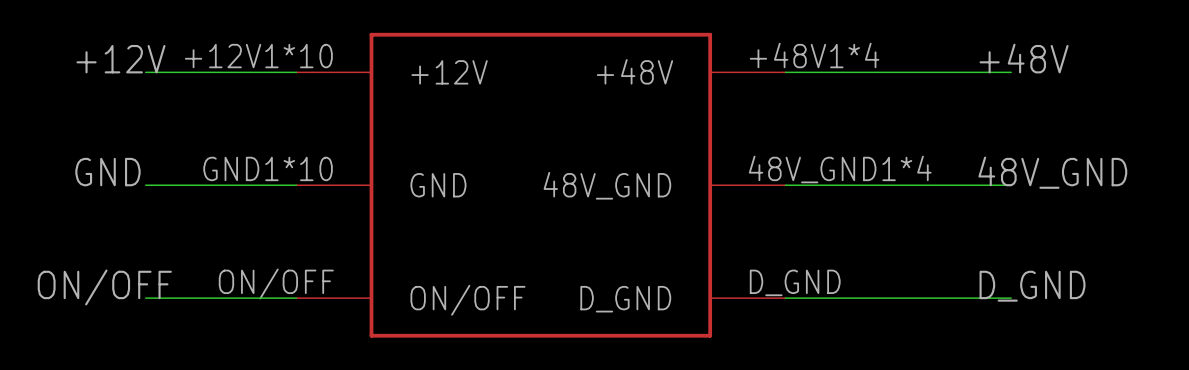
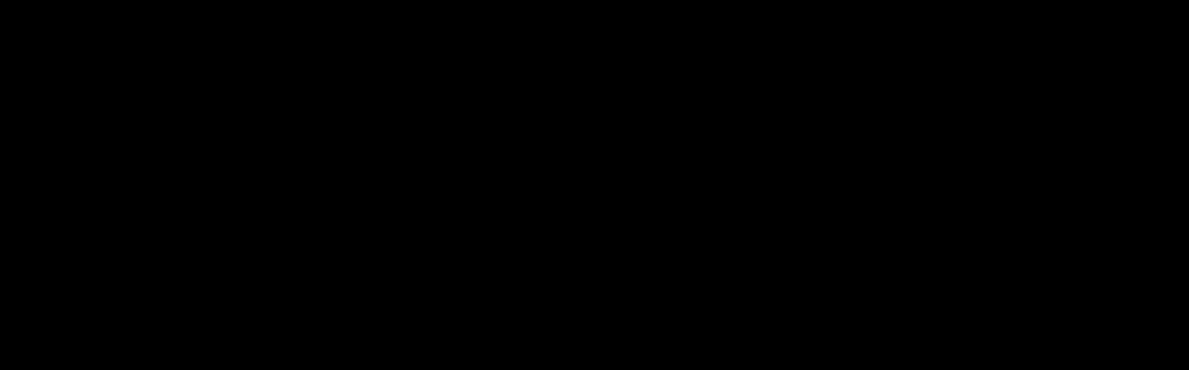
label: +48V (1024, 58) -> none
label: +12V (120, 59) -> none
wire: (145, 72) (296, 72) -> none
wire: (785, 72) (1011, 72) -> none
label: GND (107, 172) -> none
label: 48V_GND (1052, 172) -> none
wire: (145, 185) (296, 185) -> none
part: (540, 185) -> none
wire: (785, 185) (1011, 185) -> none
label: D_GND (1032, 286) -> none
label: ON/OFF (104, 287) -> none
wire: (145, 298) (296, 298) -> none
wire: (785, 298) (1011, 298) -> none

